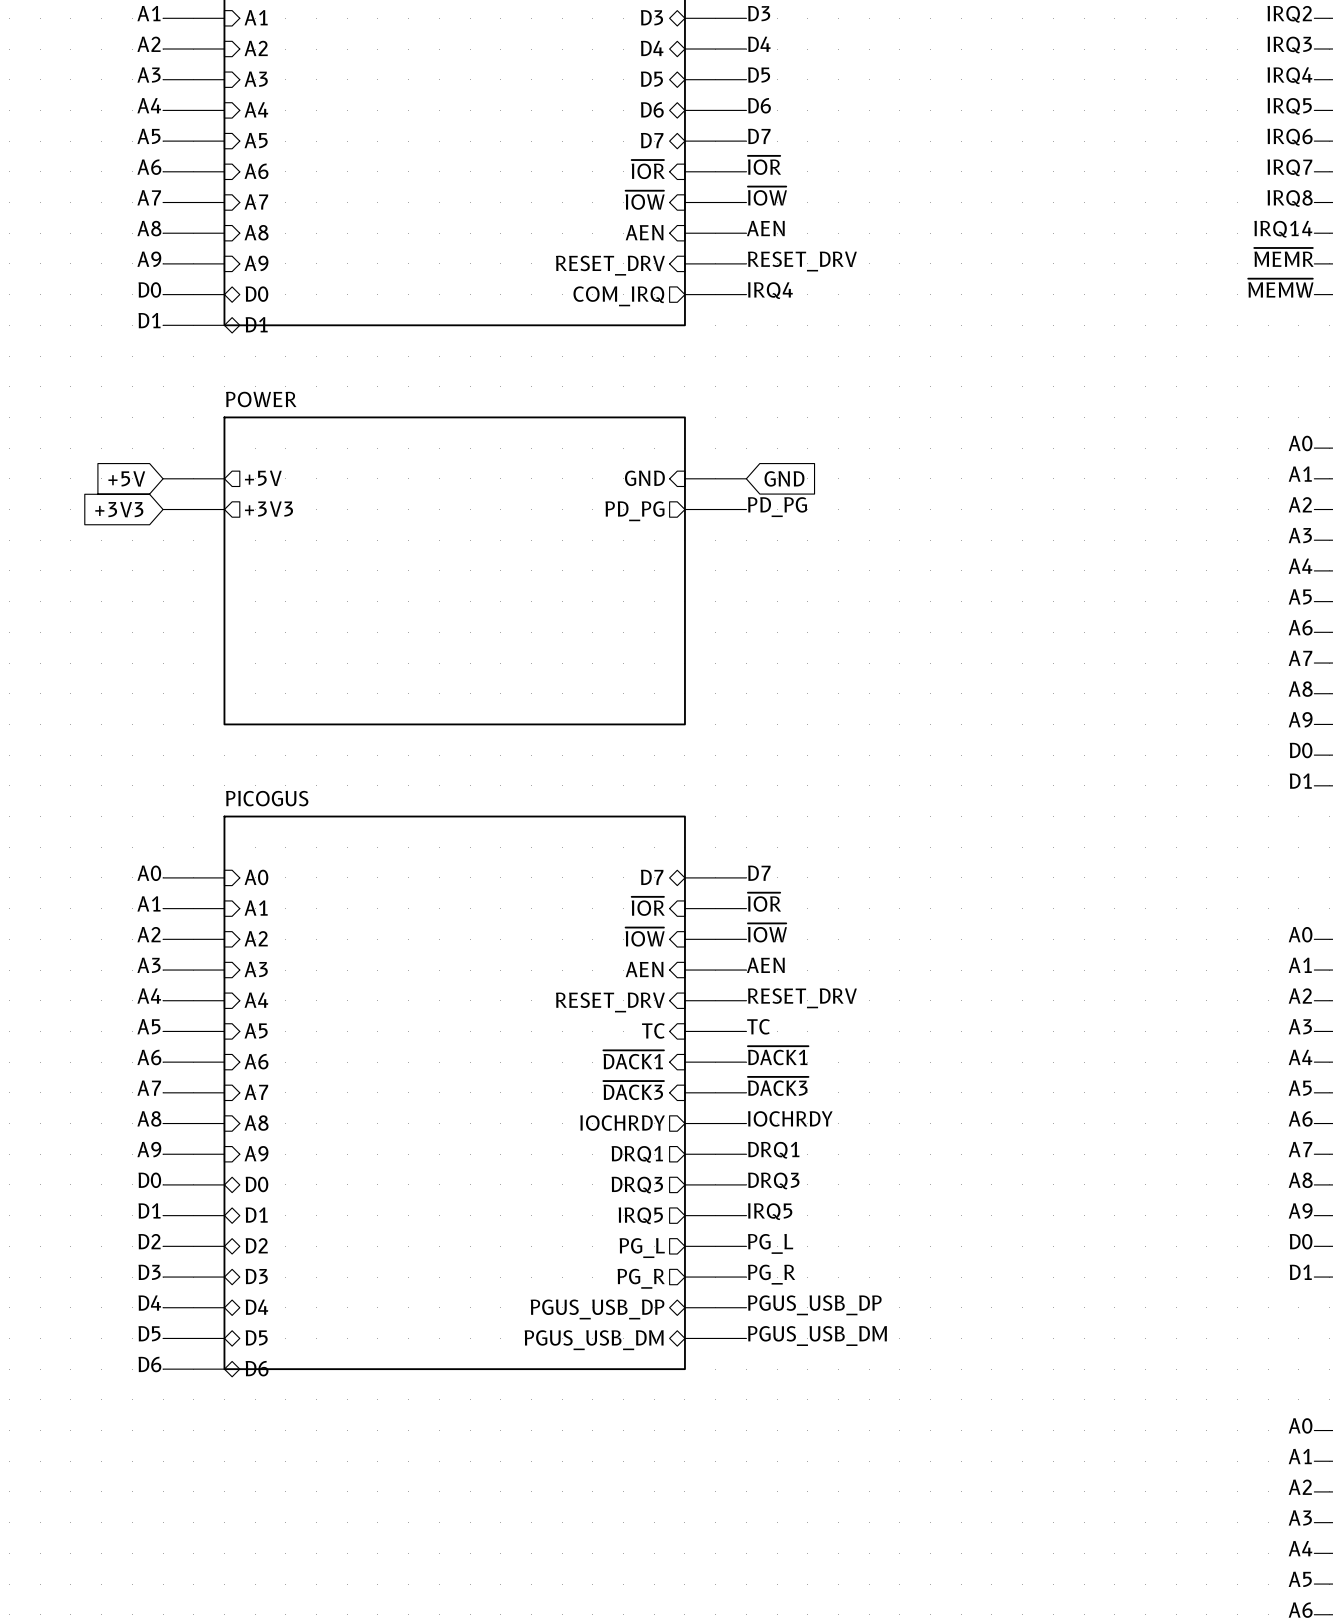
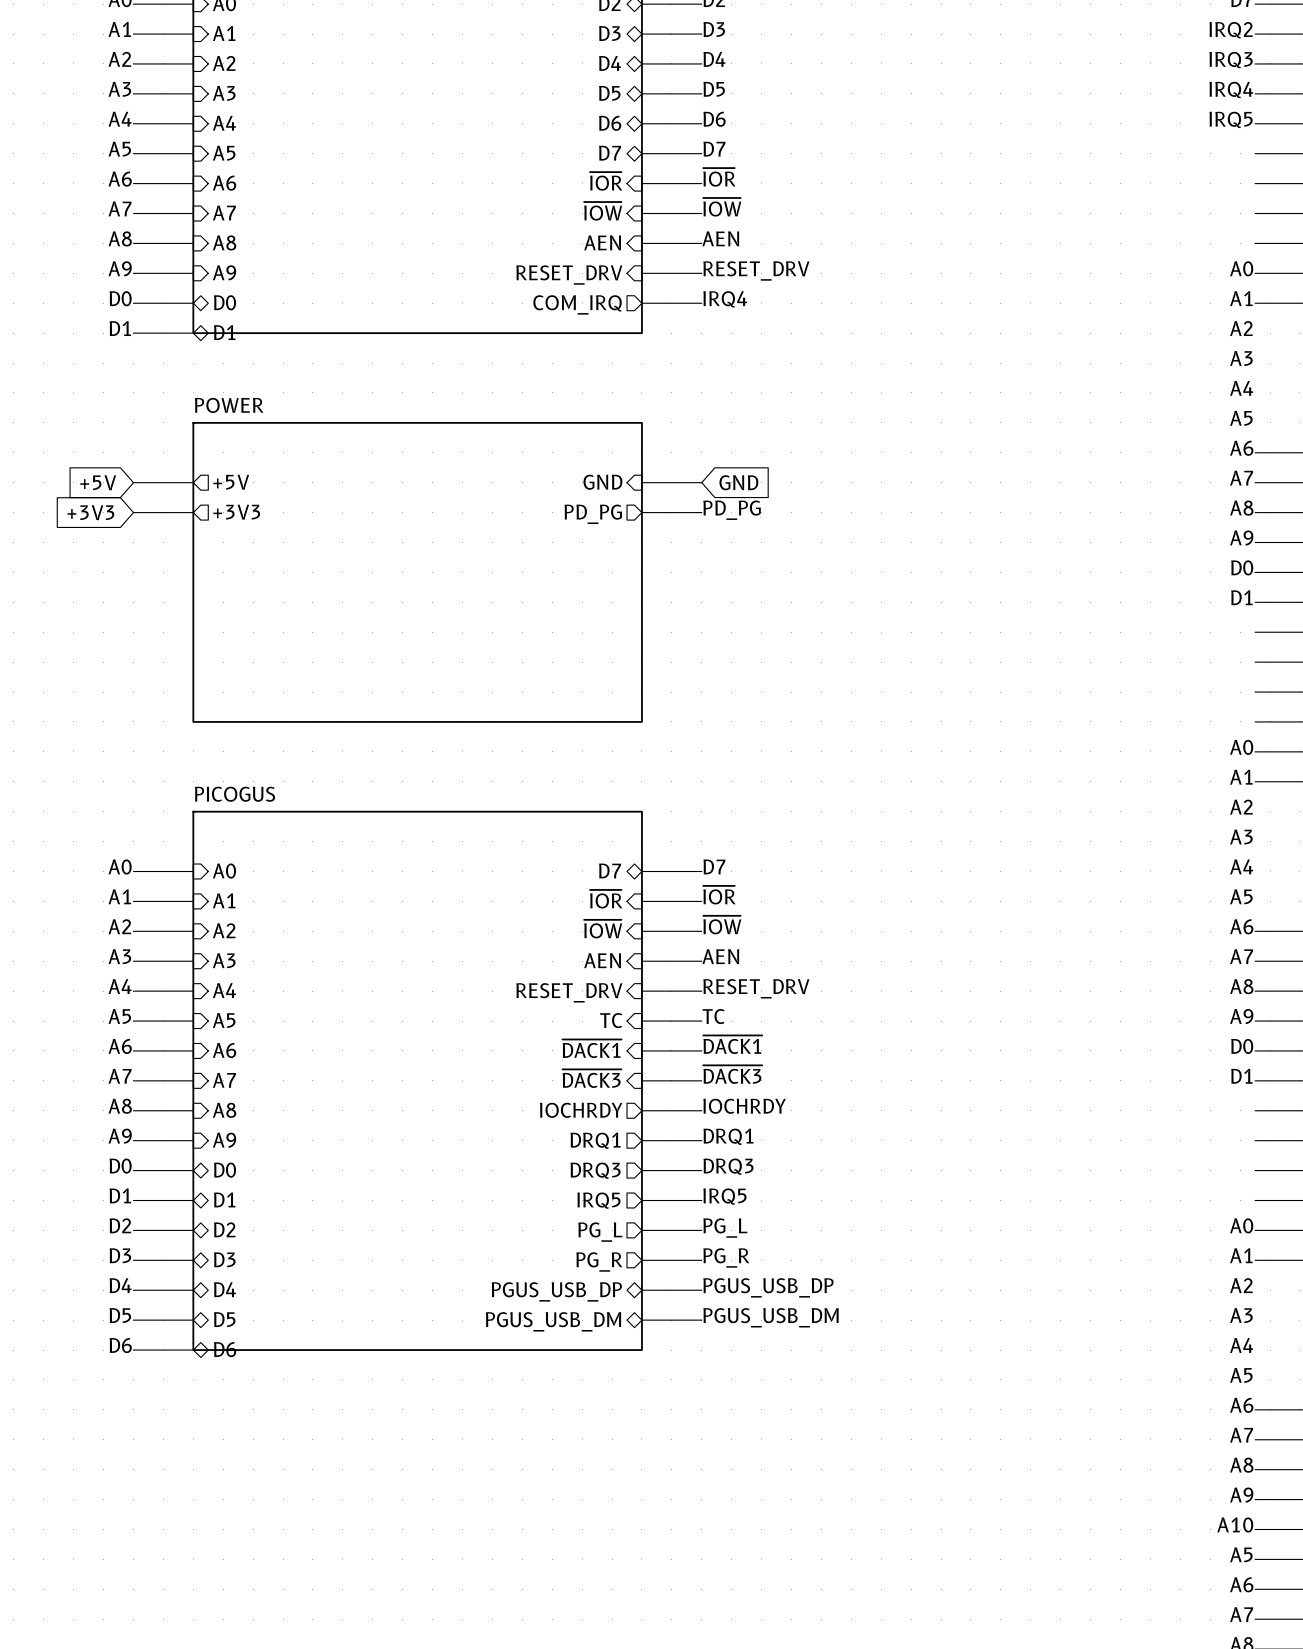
label: IRQ6 (1290, 137) -> none
label: IRQ7 (1289, 167) -> none
label: IRQ8 (1290, 198) -> none
label: IRQ14 (1283, 229) -> none
label: ~{MEMR} (1283, 257) -> A0 (1241, 268)
label: ~{MEMW} (1280, 288) -> A1 (1241, 298)
label: none -> A2 (1241, 328)
label: none -> A3 (1241, 358)
label: none -> A4 (1241, 388)
label: none -> A5 (1241, 418)
label: A0 (1300, 443) -> A6 (1241, 448)
label: A1 (1300, 474) -> A7 (1241, 478)
label: A2 (1300, 504) -> A8 (1241, 508)
label: A3 (1300, 535) -> A9 (1241, 537)
label: A4 (1300, 566) -> D0 (1242, 567)
label: A5 (1300, 596) -> D1 (1241, 597)
label: A6 (1300, 627) -> none
label: A7 (1300, 658) -> none
label: A8 (1300, 689) -> none
label: A9 (1300, 719) -> none
label: D0 (1301, 750) -> A0 (1241, 747)
label: D1 (1300, 781) -> A1 (1241, 777)
label: none -> A2 (1241, 807)
label: none -> A3 (1241, 836)
label: none -> A4 (1241, 866)
label: none -> A5 (1241, 896)
label: A0 (1300, 934) -> A6 (1241, 926)
label: A1 (1300, 965) -> A7 (1241, 956)
label: A2 (1300, 996) -> A8 (1241, 986)
label: A3 (1300, 1026) -> A9 (1241, 1016)
label: A4 (1300, 1057) -> D0 (1242, 1046)
label: A5 (1300, 1088) -> D1 (1241, 1076)
label: A6 (1300, 1118) -> none
label: A7 (1300, 1149) -> none
label: A8 (1300, 1180) -> none
label: A9 (1300, 1211) -> none
label: D0 (1301, 1241) -> A0 (1241, 1225)
label: D1 (1300, 1272) -> A1 (1241, 1255)
label: none -> A2 (1241, 1285)
label: none -> A3 (1241, 1315)
label: none -> A4 (1241, 1345)
label: none -> A5 (1241, 1375)
label: A0 (1300, 1425) -> A6 (1241, 1405)
label: A1 (1300, 1456) -> A7 (1241, 1435)
label: A2 (1300, 1487) -> A8 (1241, 1465)
label: A3 (1300, 1517) -> A9 (1241, 1495)
label: A4 (1300, 1548) -> A10 (1235, 1524)

